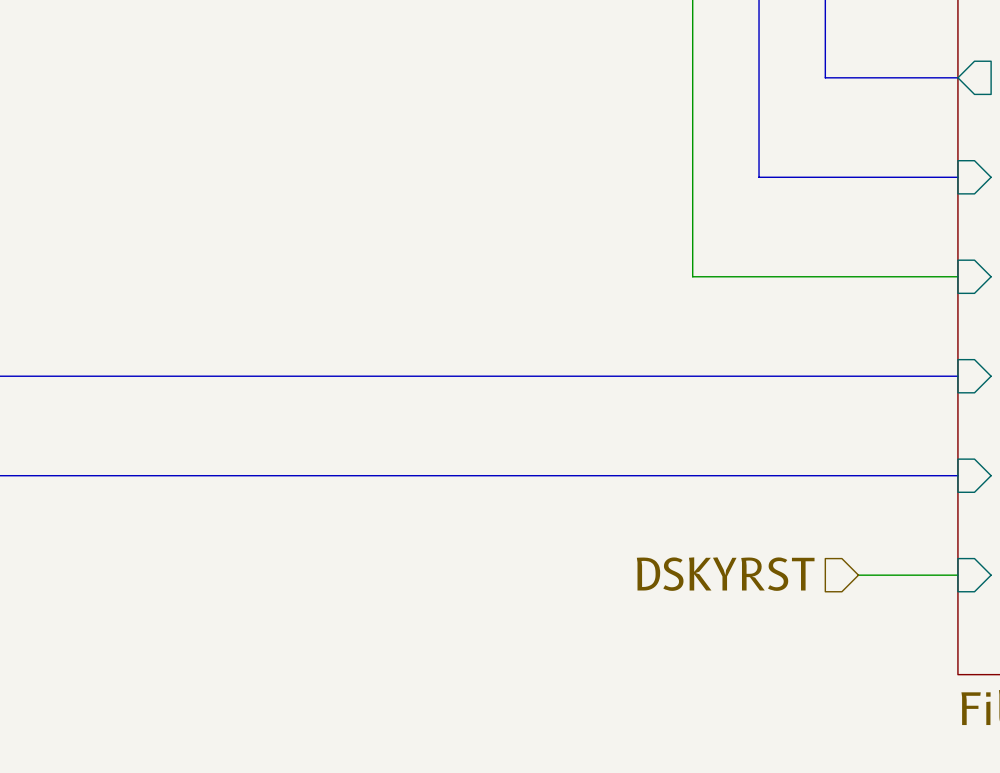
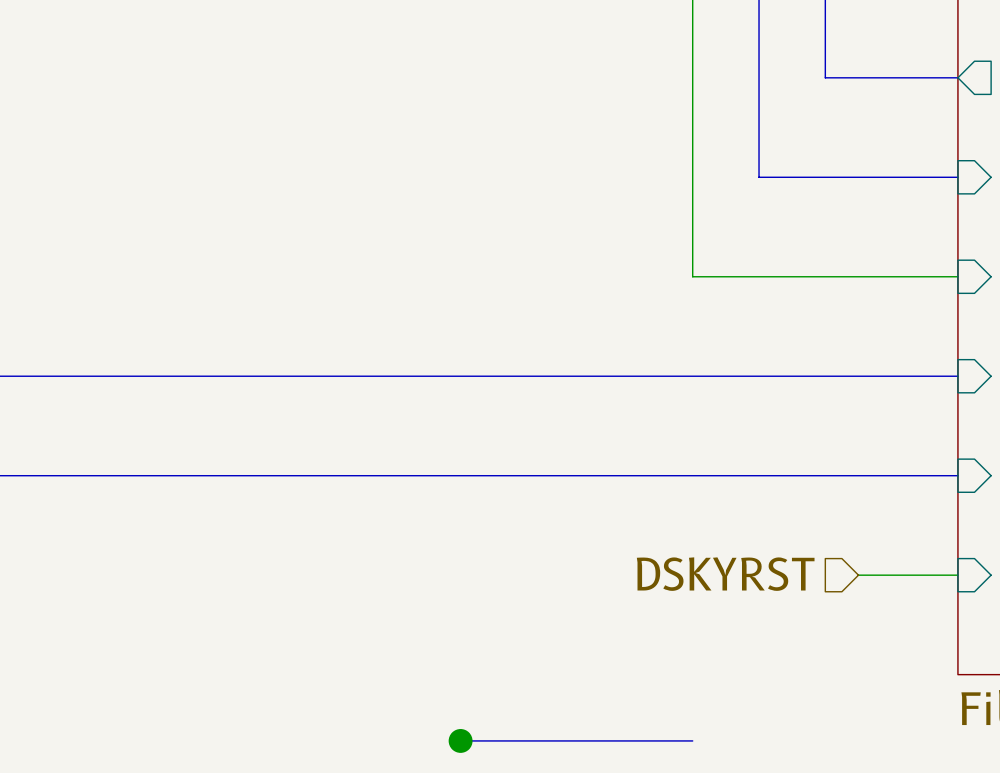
bus: none -> (460, 740) (692, 740)
junction: none -> (460, 740)

